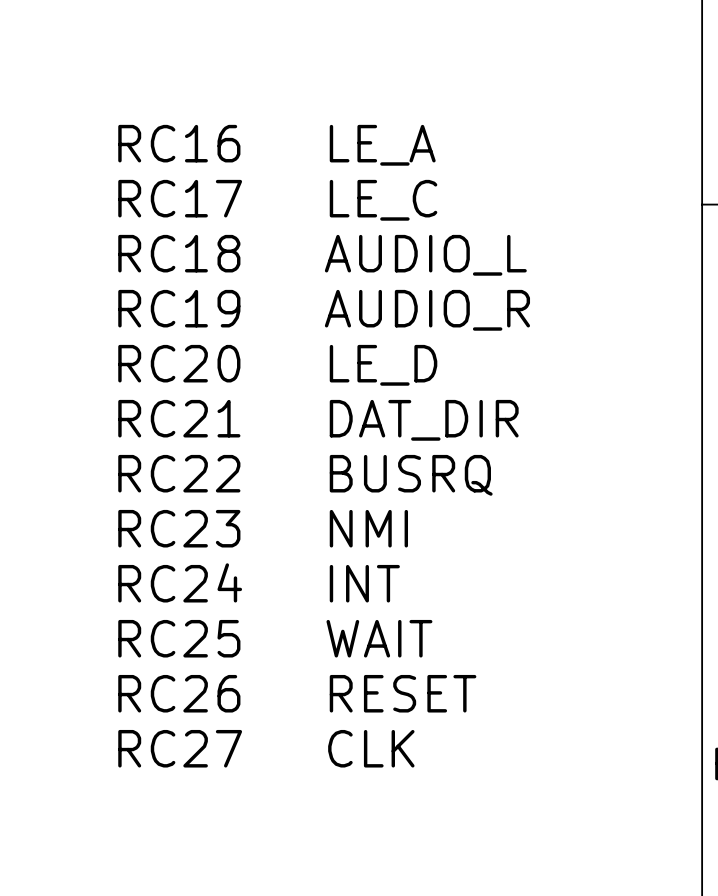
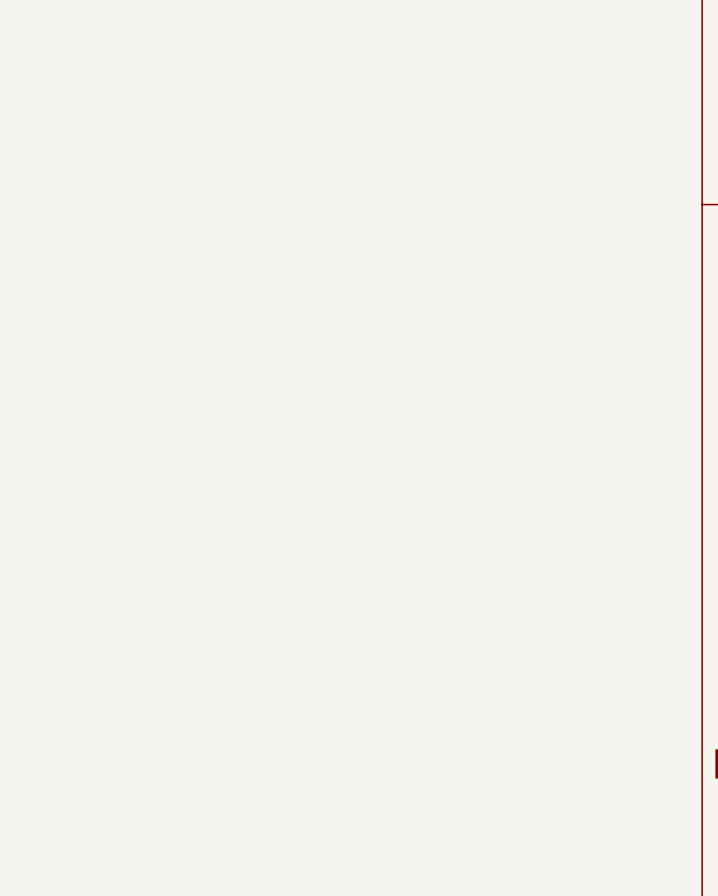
text: RC16 LE_A (276, 145) -> none
text: RC17 LE_C (277, 200) -> none
text: RC18 AUDIO_L (322, 255) -> none
text: RC19 AUDIO_R (324, 310) -> none
text: RC20 LE_D (277, 365) -> none
text: RC21 DAT_DIR (318, 420) -> none
text: RC22 BUSRQ (305, 475) -> none
text: RC23 NMI (263, 528) -> none
text: RC24 INT (259, 582) -> none
text: RC25 WAIT (275, 638) -> none
text: RC26 RESET (297, 693) -> none
text: RC27 CLK (266, 748) -> none

